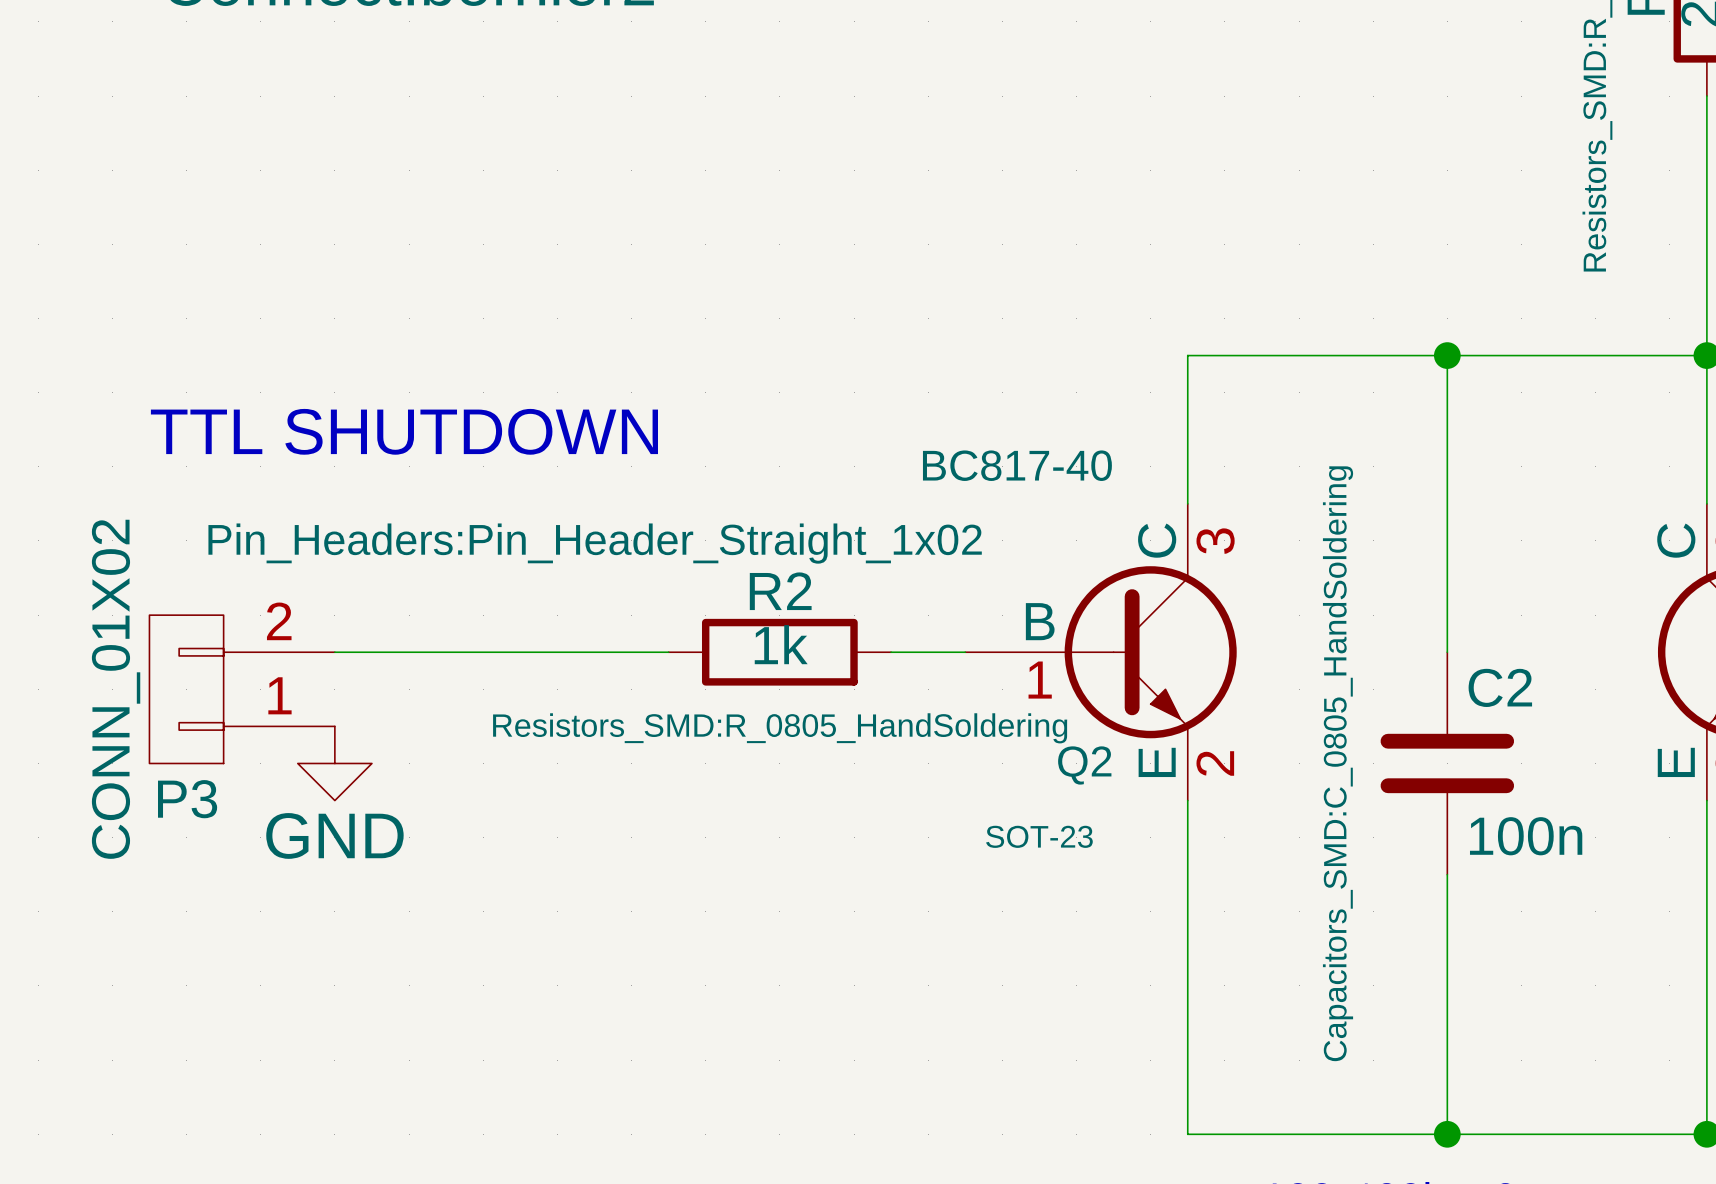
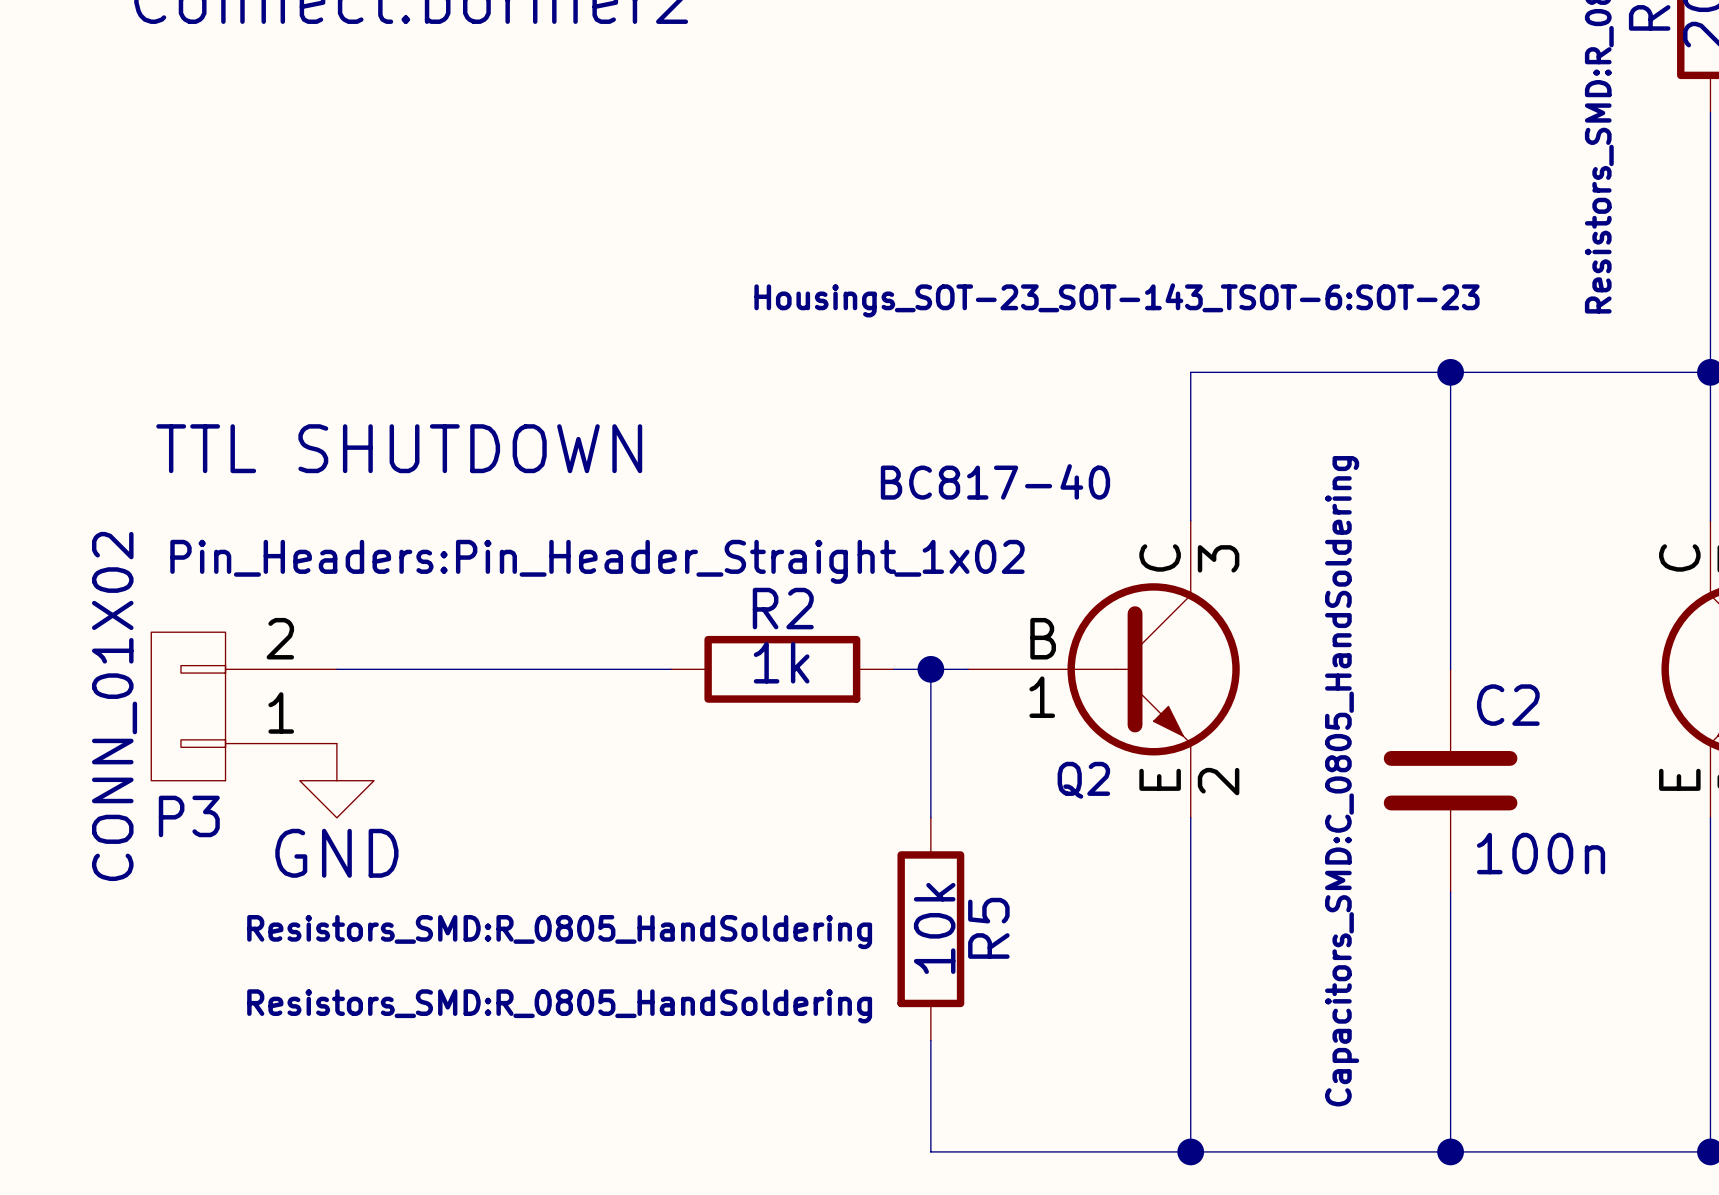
wire: none -> (930, 669) (930, 817)
junction: none -> (930, 669)
R2 text position: Resistors_SMD:R_0805_HandSoldering (780, 728) -> Resistors_SMD:R_0805_HandSoldering (559, 932)
Q2 text: SOT-23 (1039, 836) -> Housings_SOT-23_SOT-143_TSOT-6:SOT-23 (1116, 300)
R5: none -> 10k (930, 929)
wire: none -> (930, 1040) (930, 1151) (1190, 1151)
junction: none -> (1190, 1151)

